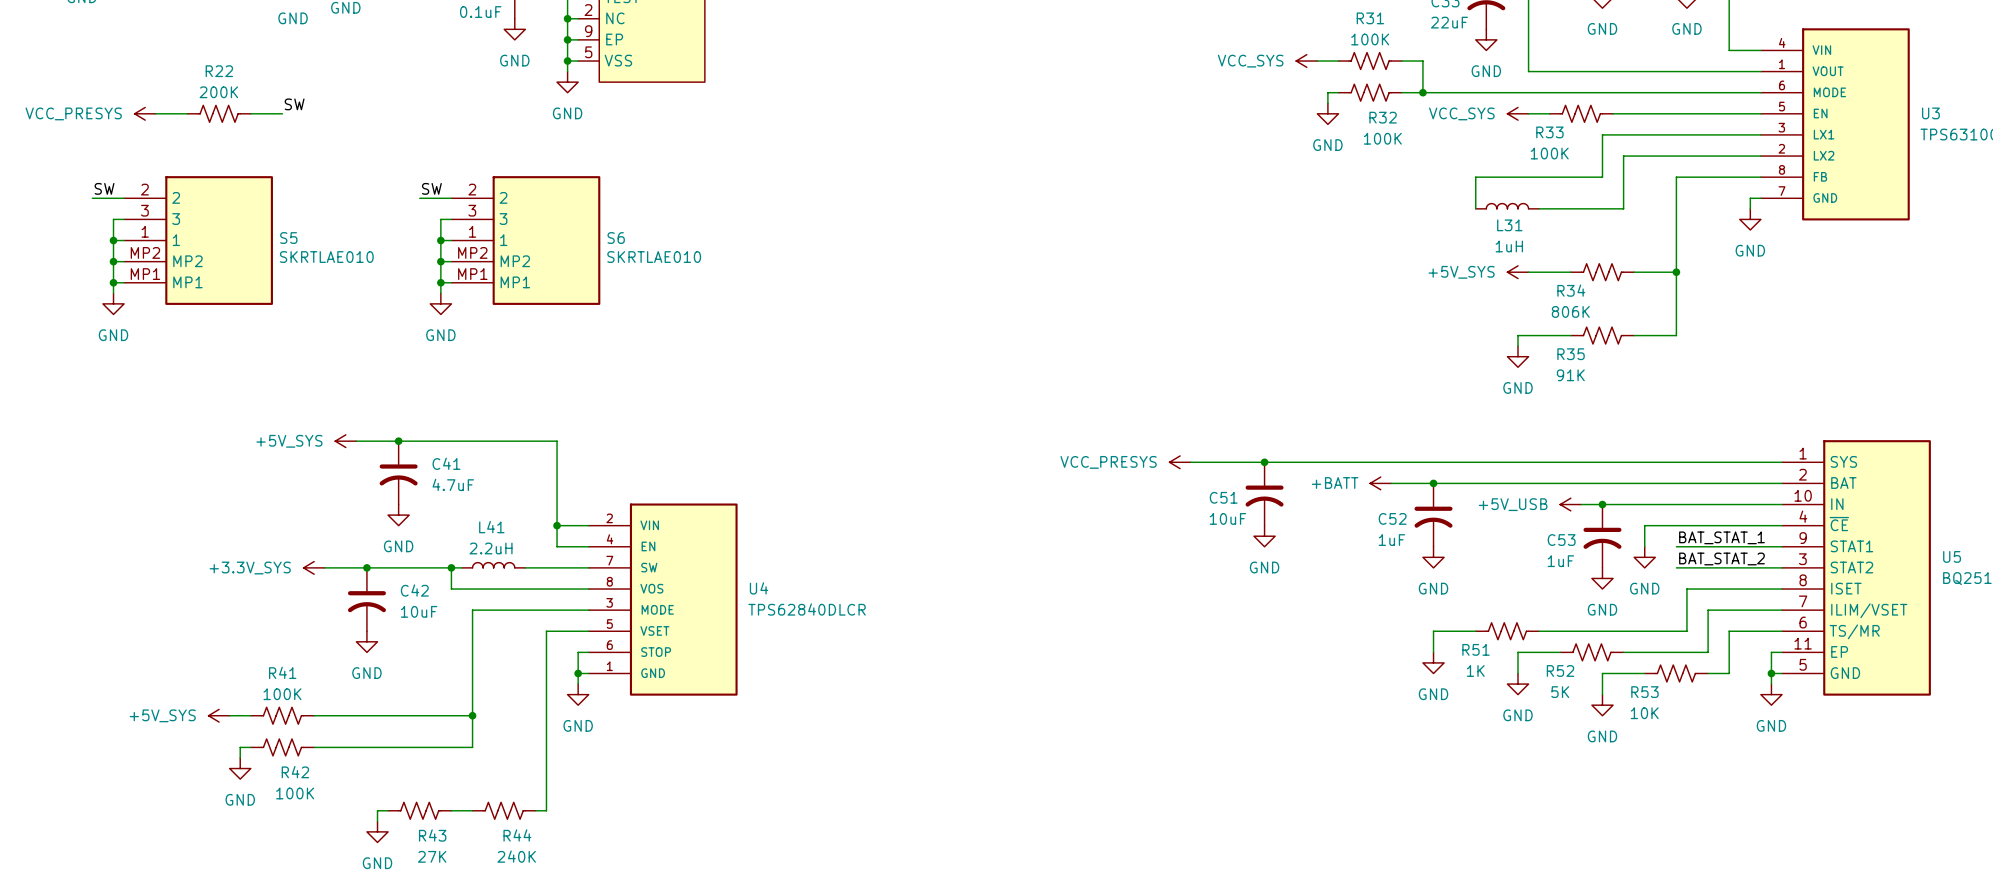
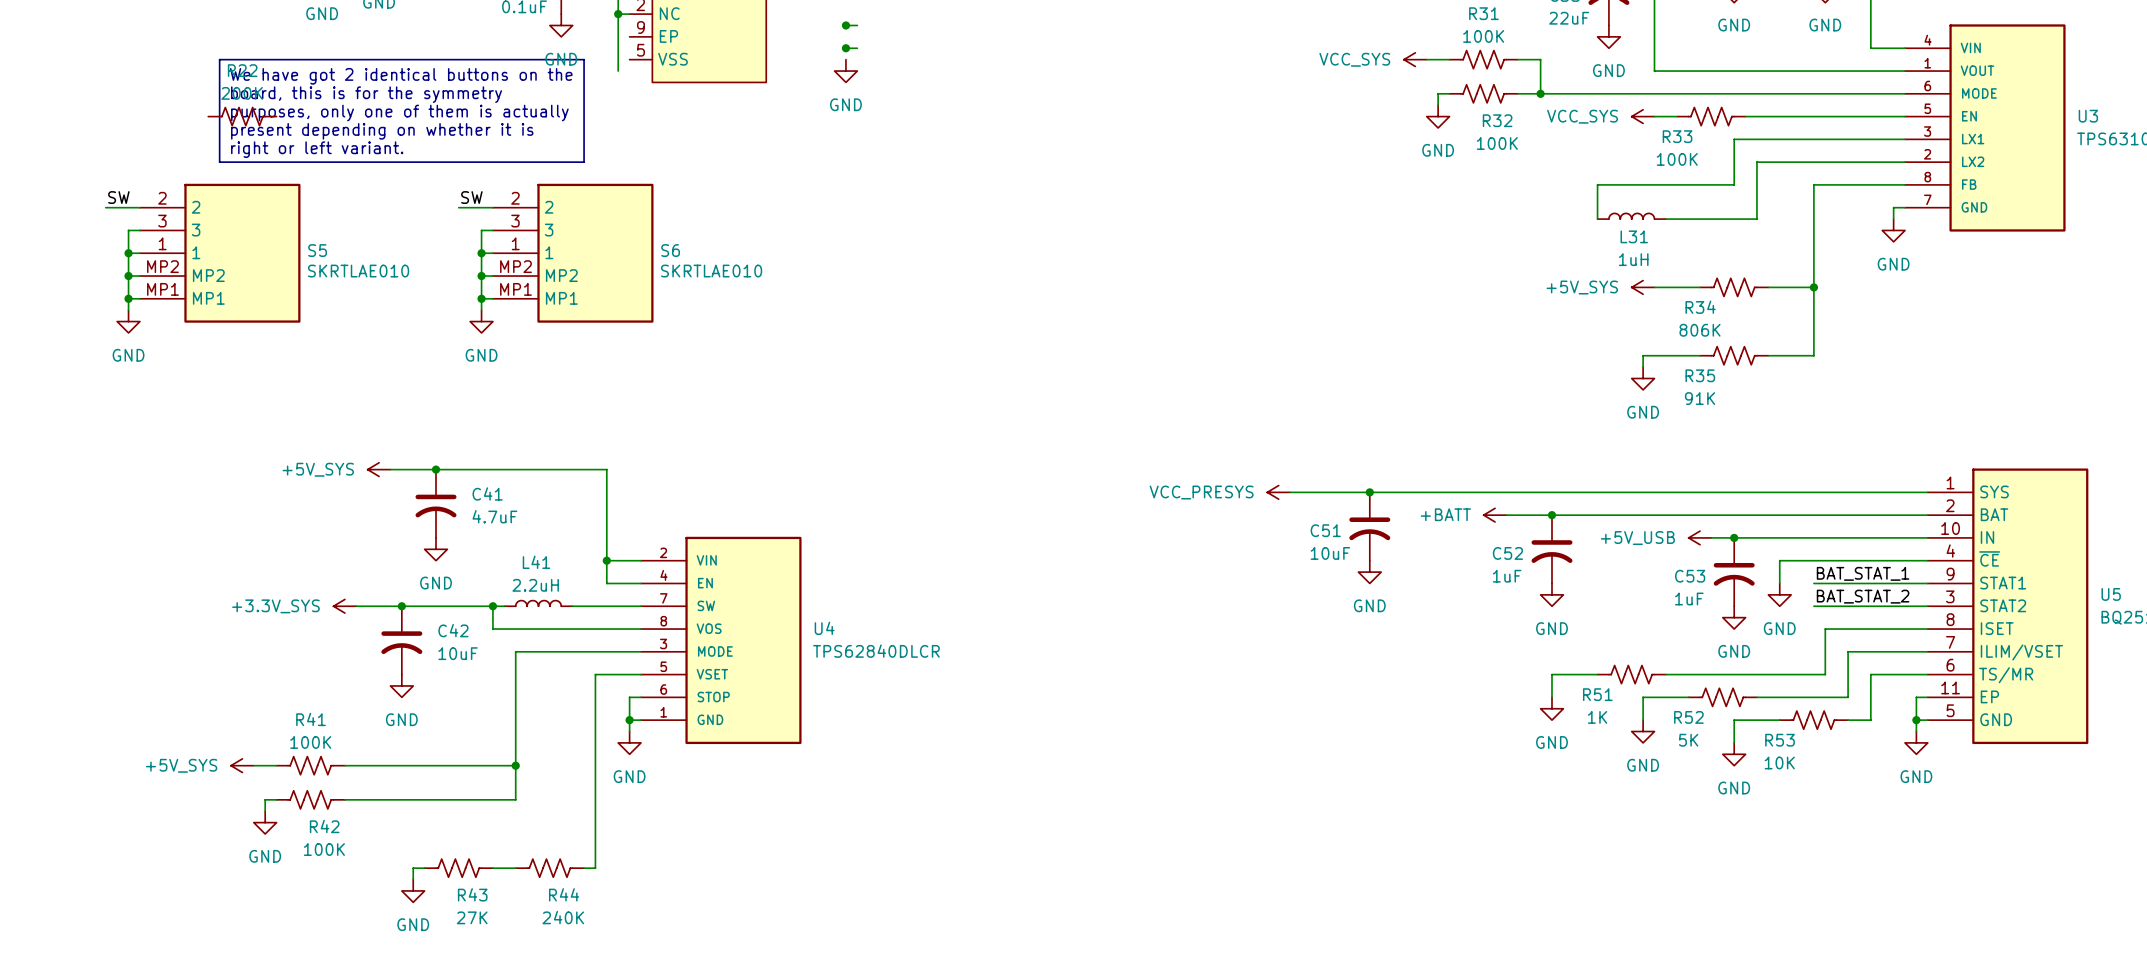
wire: none -> (845, 25) (857, 25)
junction: none -> (845, 25)
wire: (567, 39) (578, 39) -> none
junction: (567, 39) -> none
wire: none -> (845, 48) (857, 48)
junction: none -> (845, 48)
line: none -> (219, 59) (584, 59) (584, 162) (219, 162) (219, 59)
wire: (567, 61) (578, 61) -> none
junction: (567, 61) -> none
power symbol: none -> GND (845, 71)
text: none -> We have got 2 identical buttons on the (401, 76)
power symbol: GND (567, 82) -> none
text: none -> board, this is for the symmetry (366, 94)
label: SW (294, 104) -> none
text: none -> purposes, only one of them is actually (399, 112)
power symbol: VCC_PRESYS (145, 113) -> none
wire: (155, 113) (187, 113) -> none
wire: (250, 113) (282, 113) -> none
text: none -> present depending on whether it is (382, 131)
text: none -> right or left variant. (317, 149)

